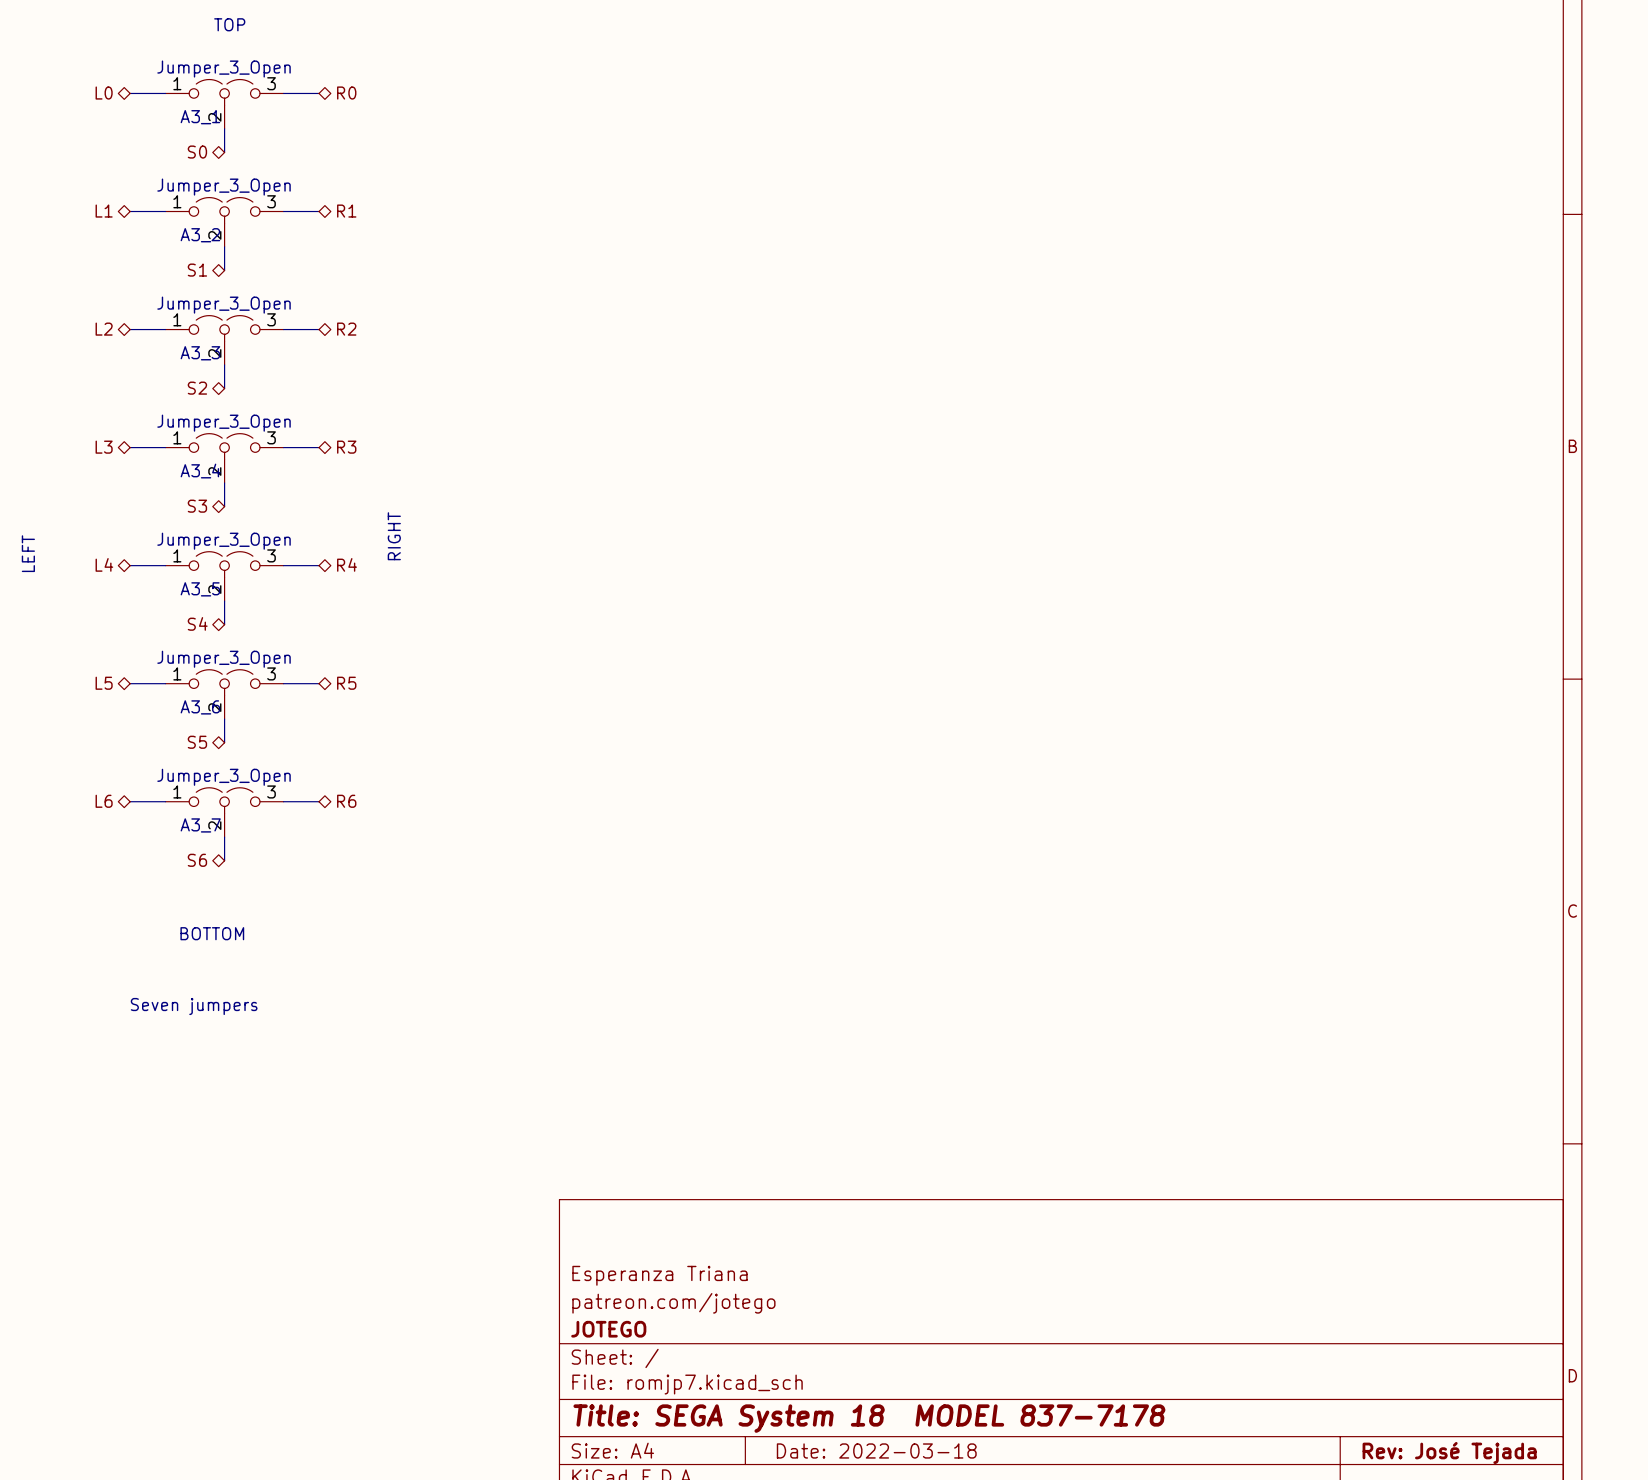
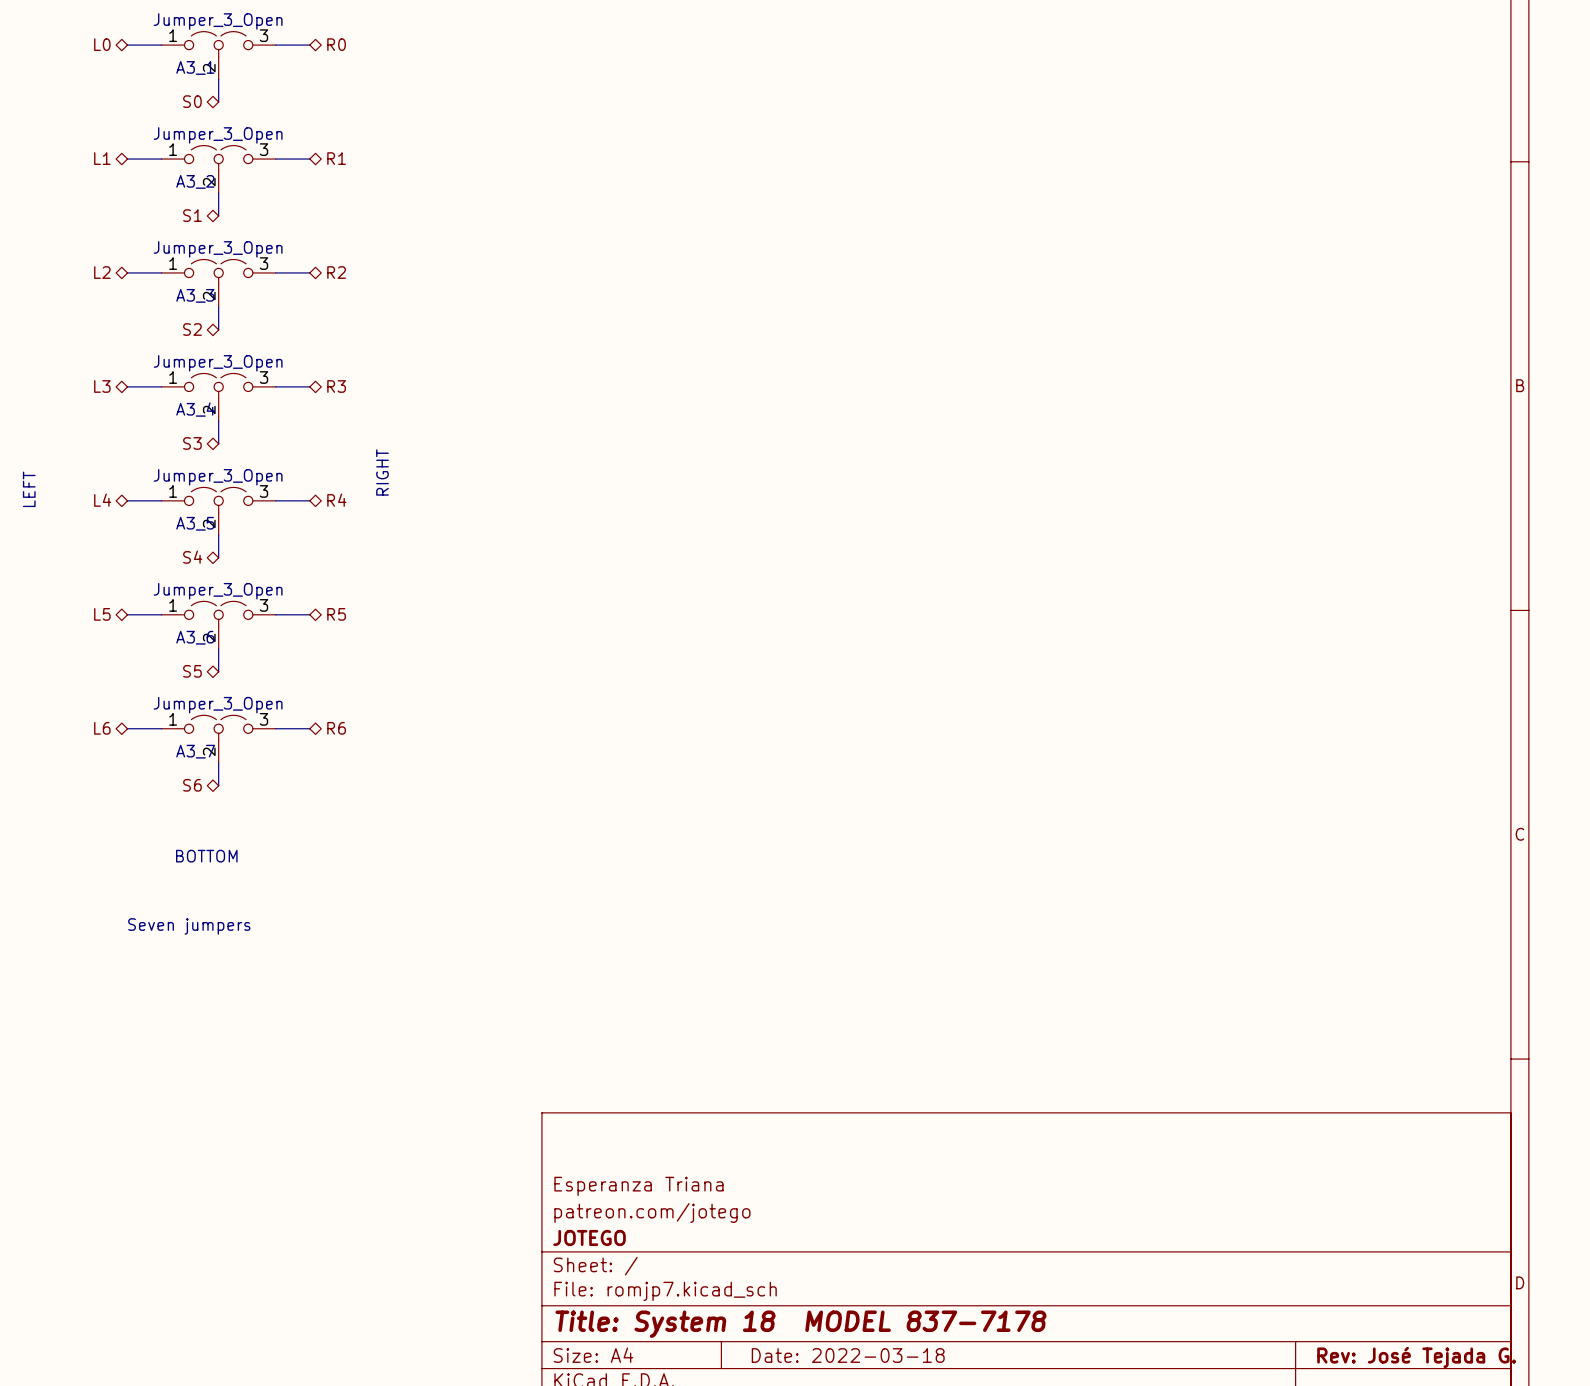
title block: Title: SEGA System 18 MODEL 837-7178 (869, 1418) -> Title: System 18 MODEL 837-7178 (800, 1324)
title block: Rev: José Tejada (1449, 1452) -> Rev: José Tejada G. (1416, 1357)

